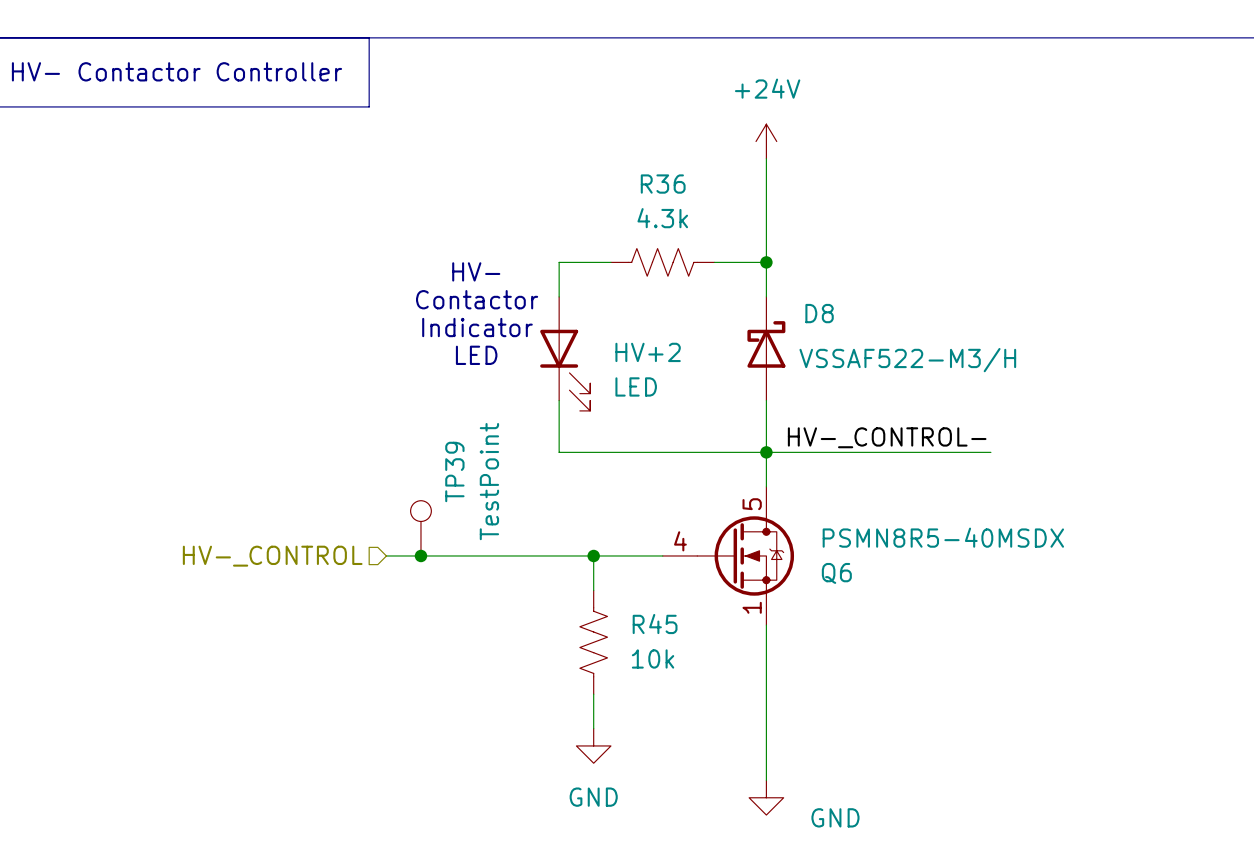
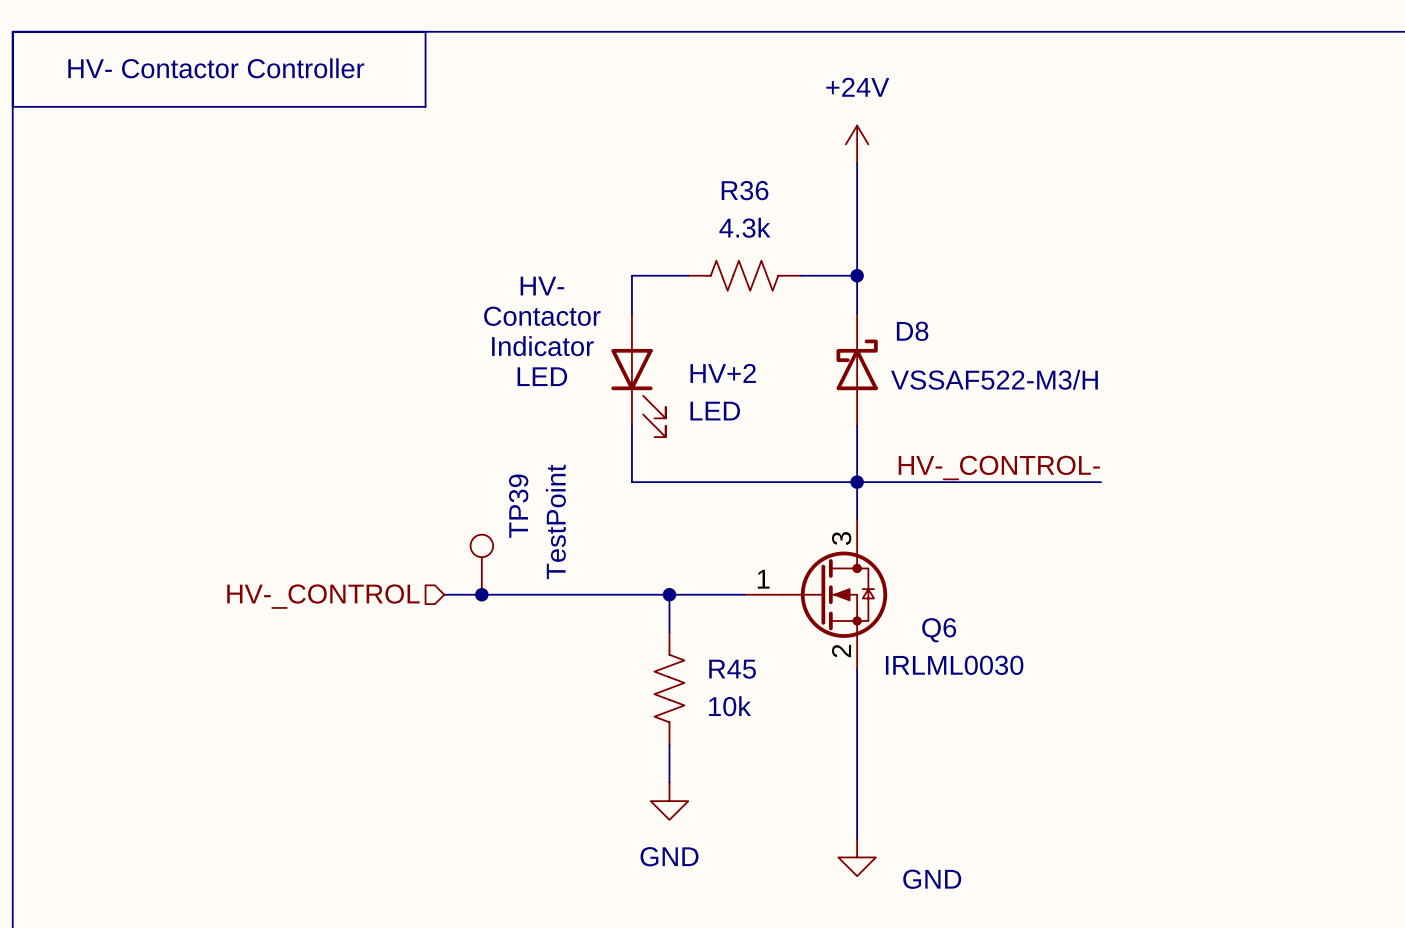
Q6 symbol: [662, 486, 795, 626] -> [744, 519, 888, 670]
Q6 value: PSMN8R5-40MSDX (943, 537) -> IRLML0030 (954, 665)

